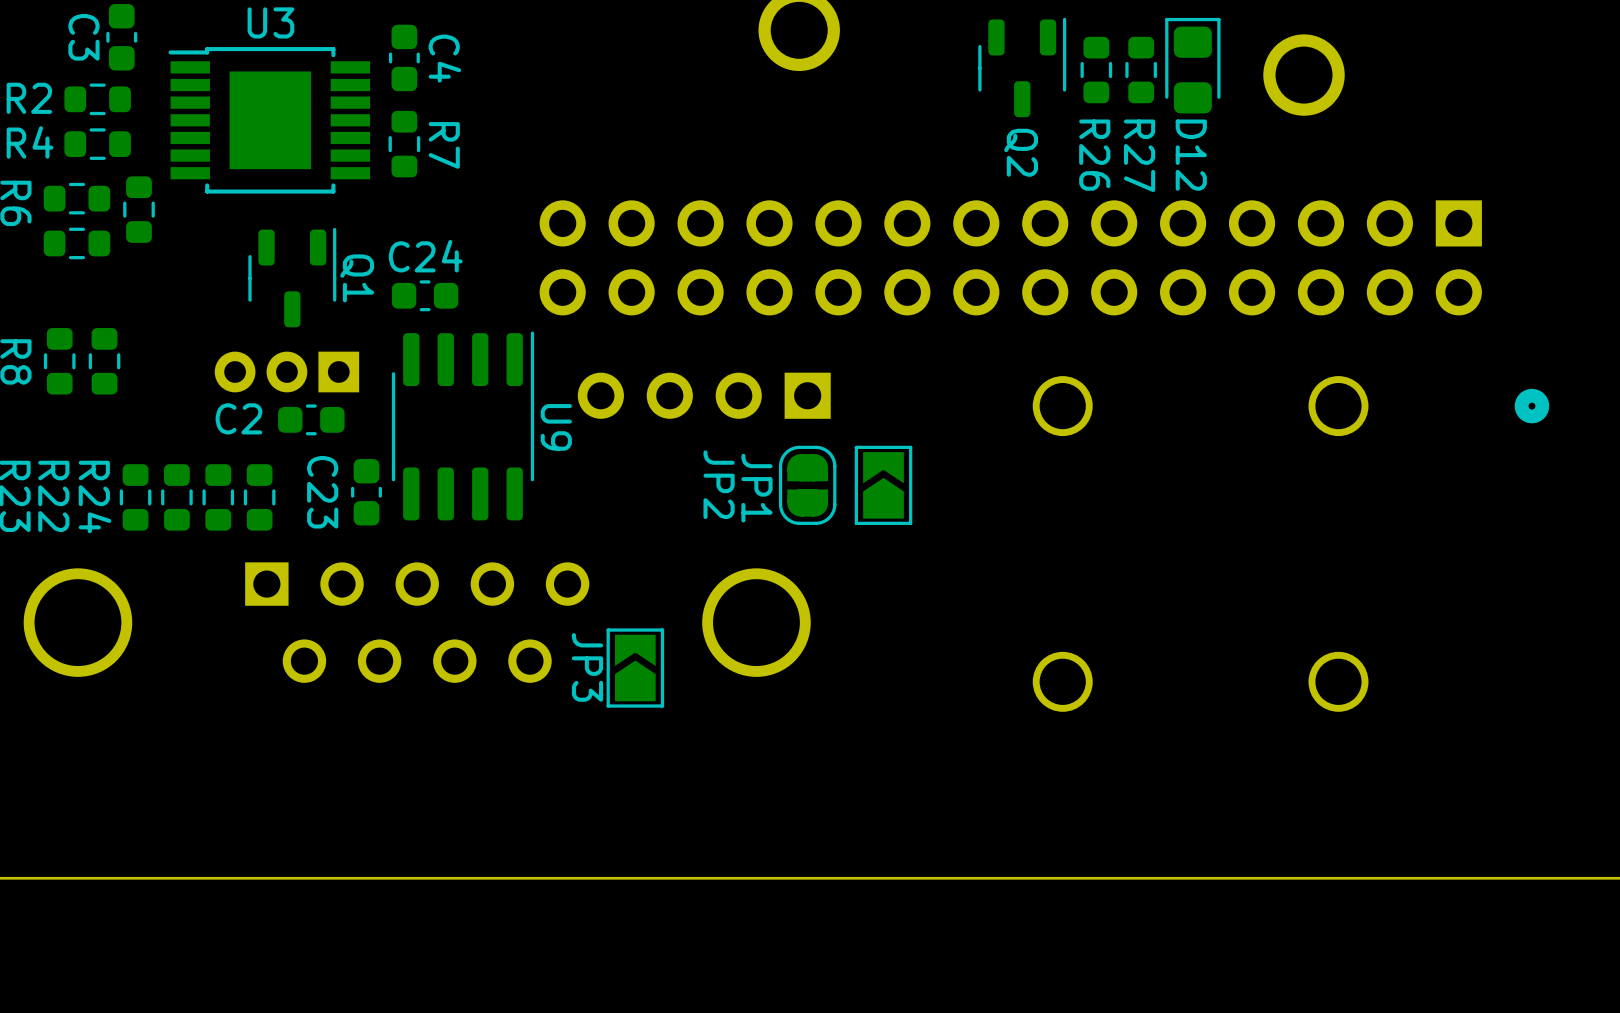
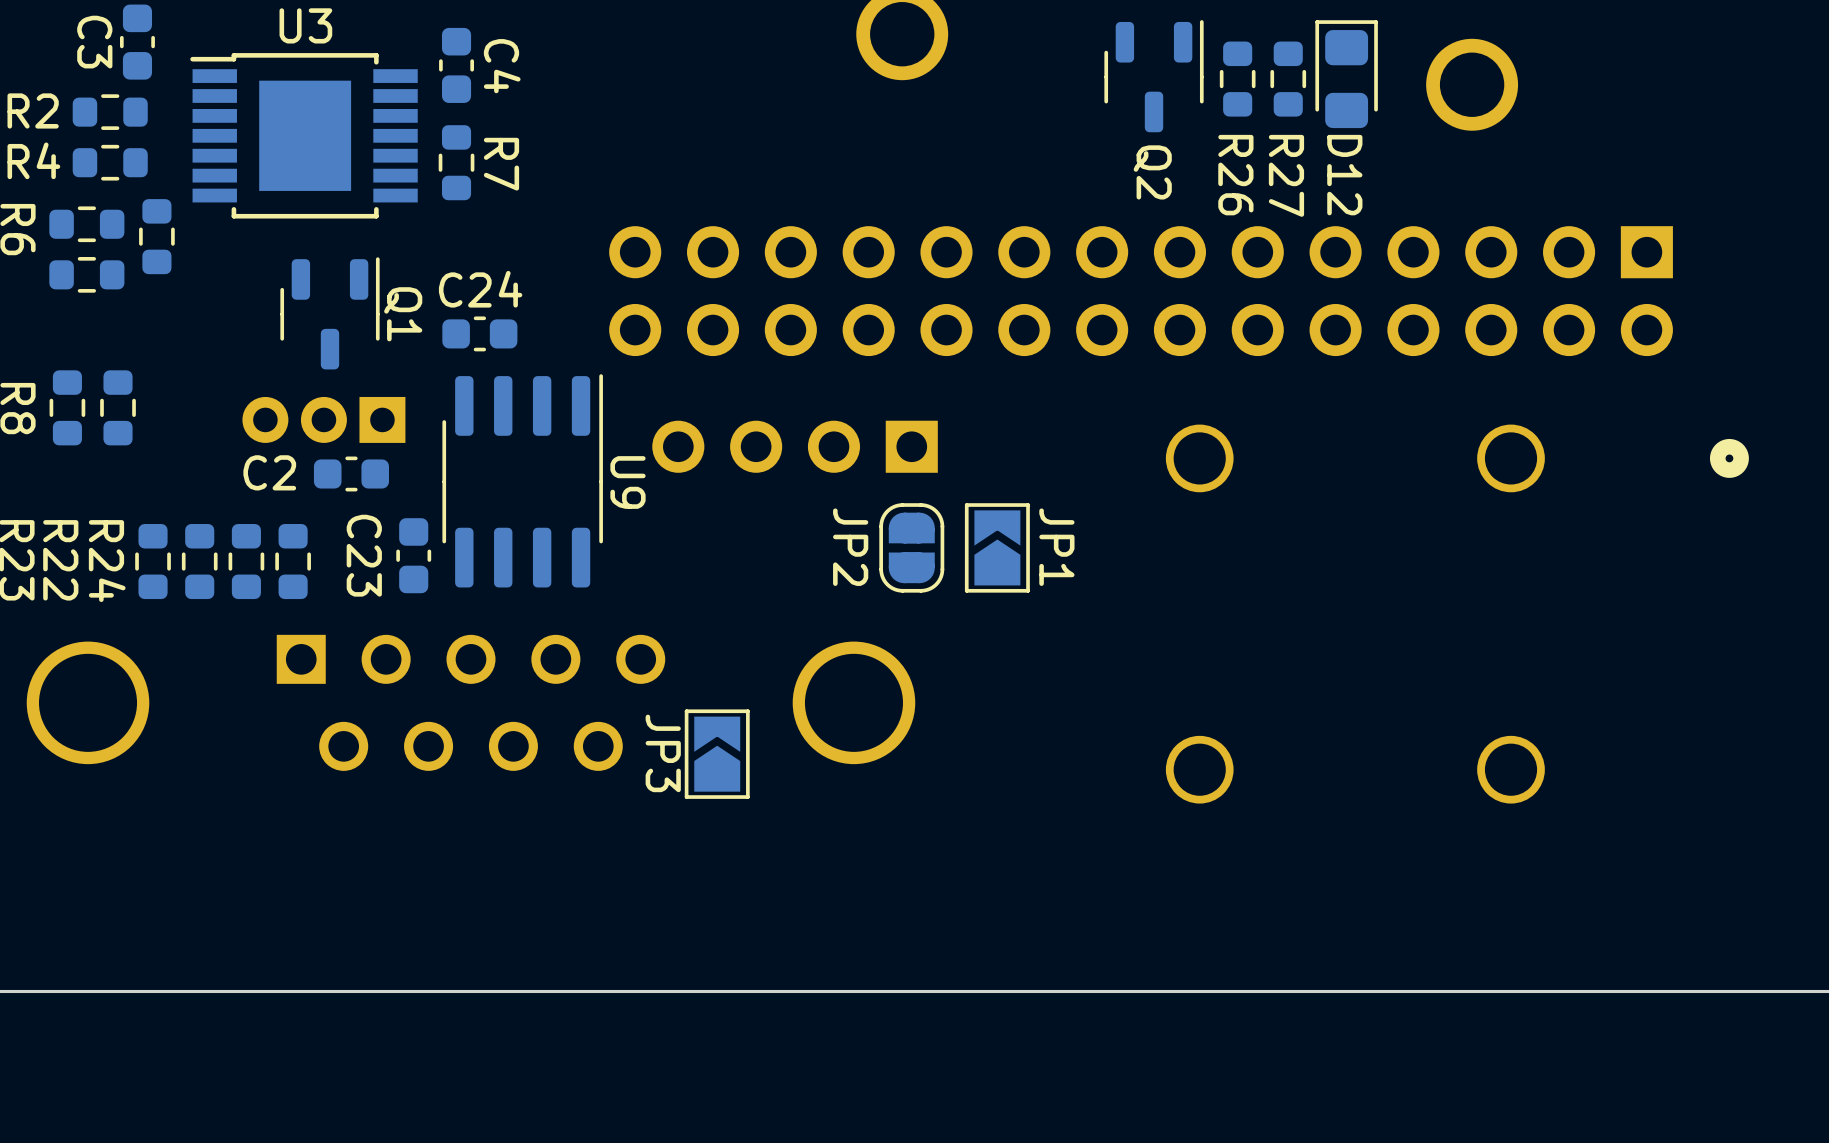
JP2 name position: JP2 (719, 484) -> JP2 (850, 547)
JP1 name position: JP1 (756, 488) -> JP1 (1056, 547)

